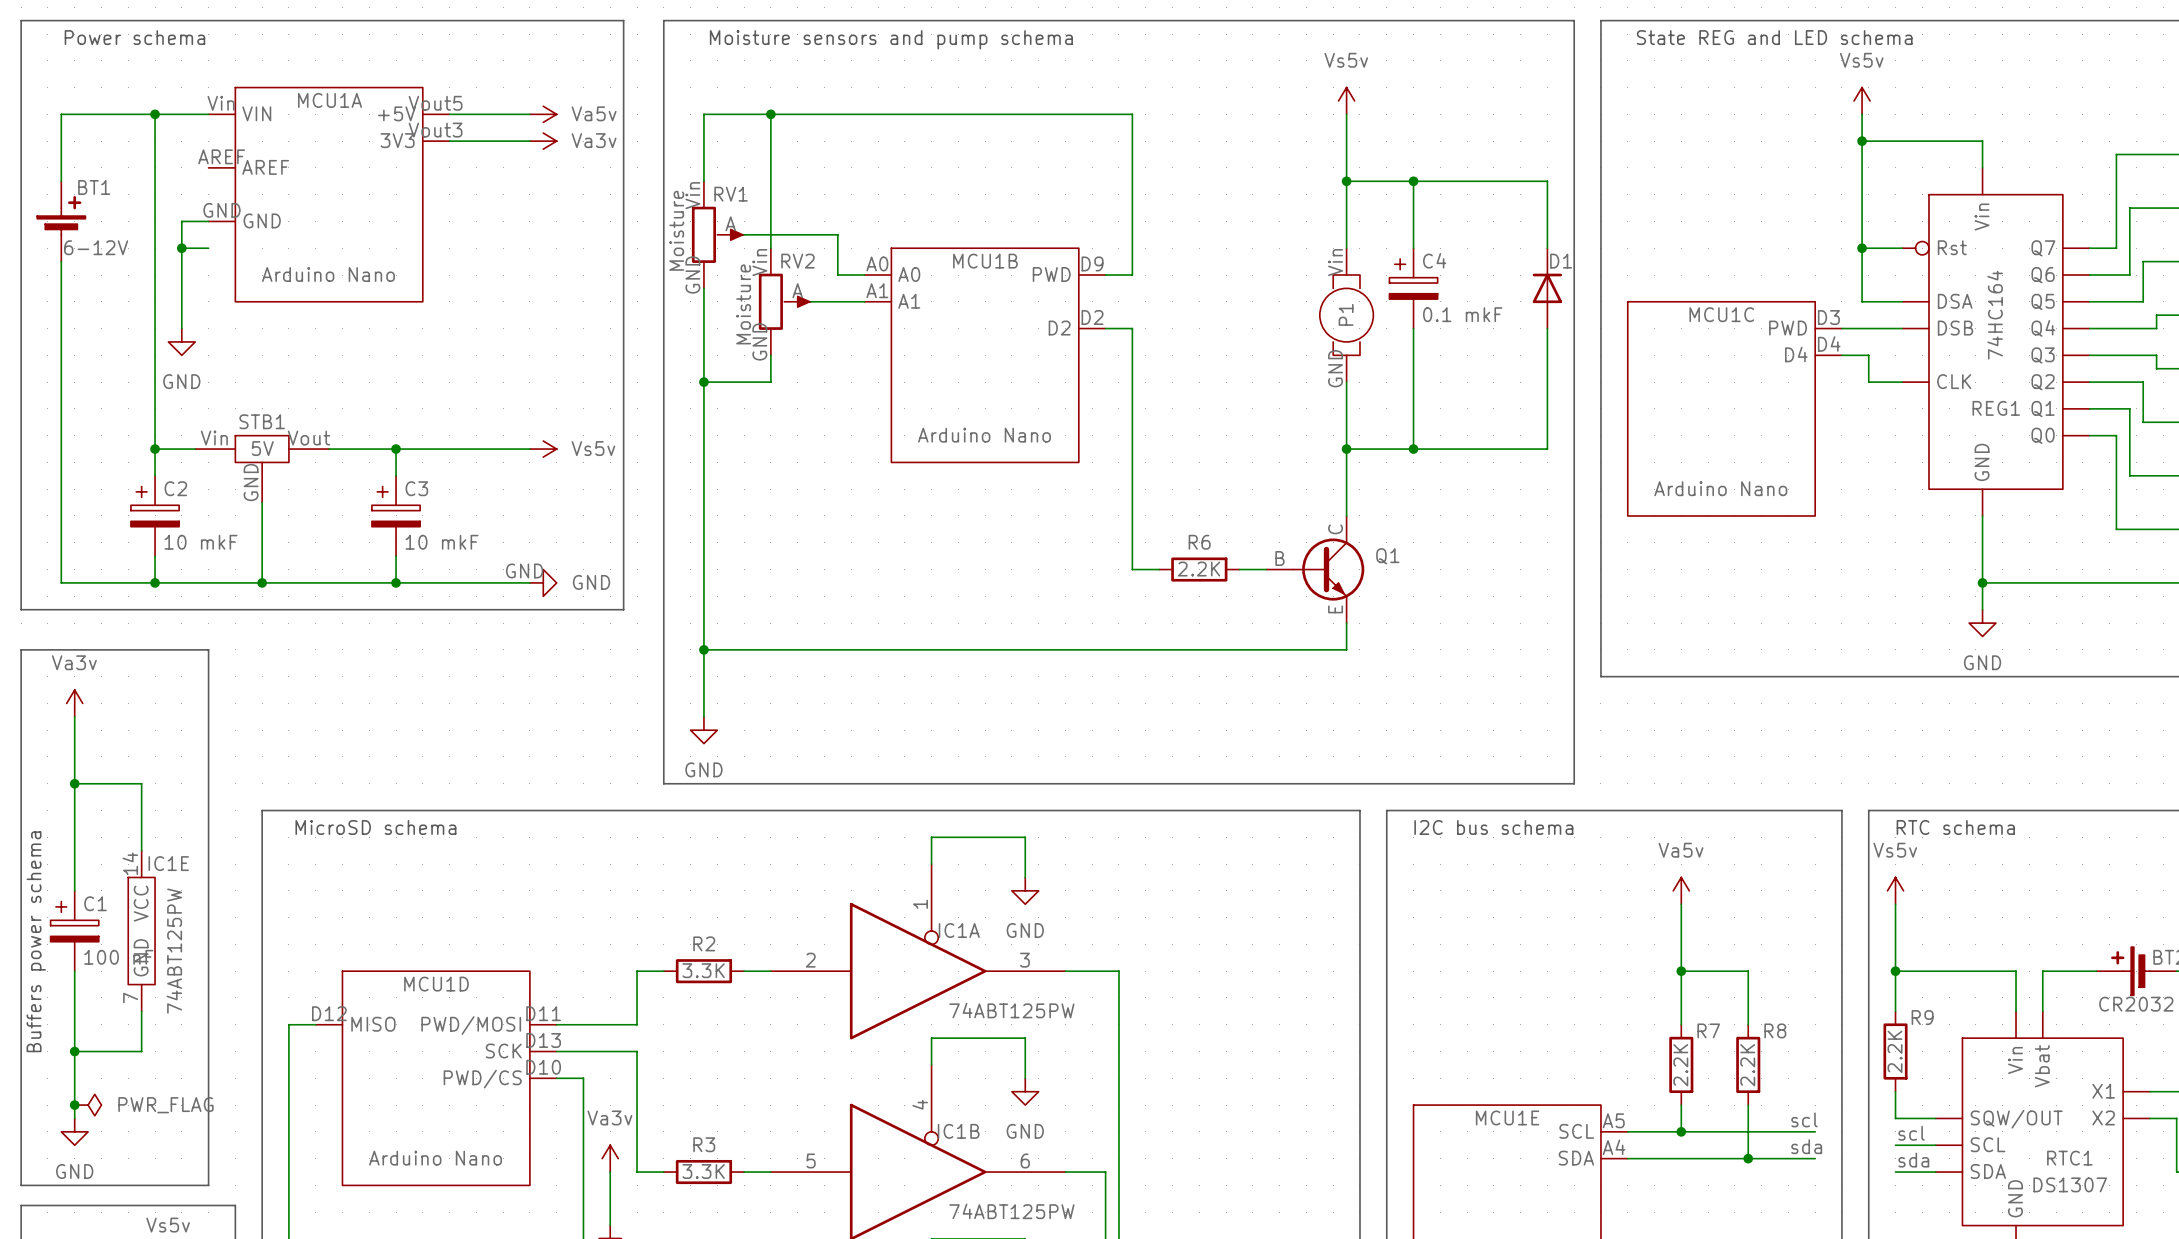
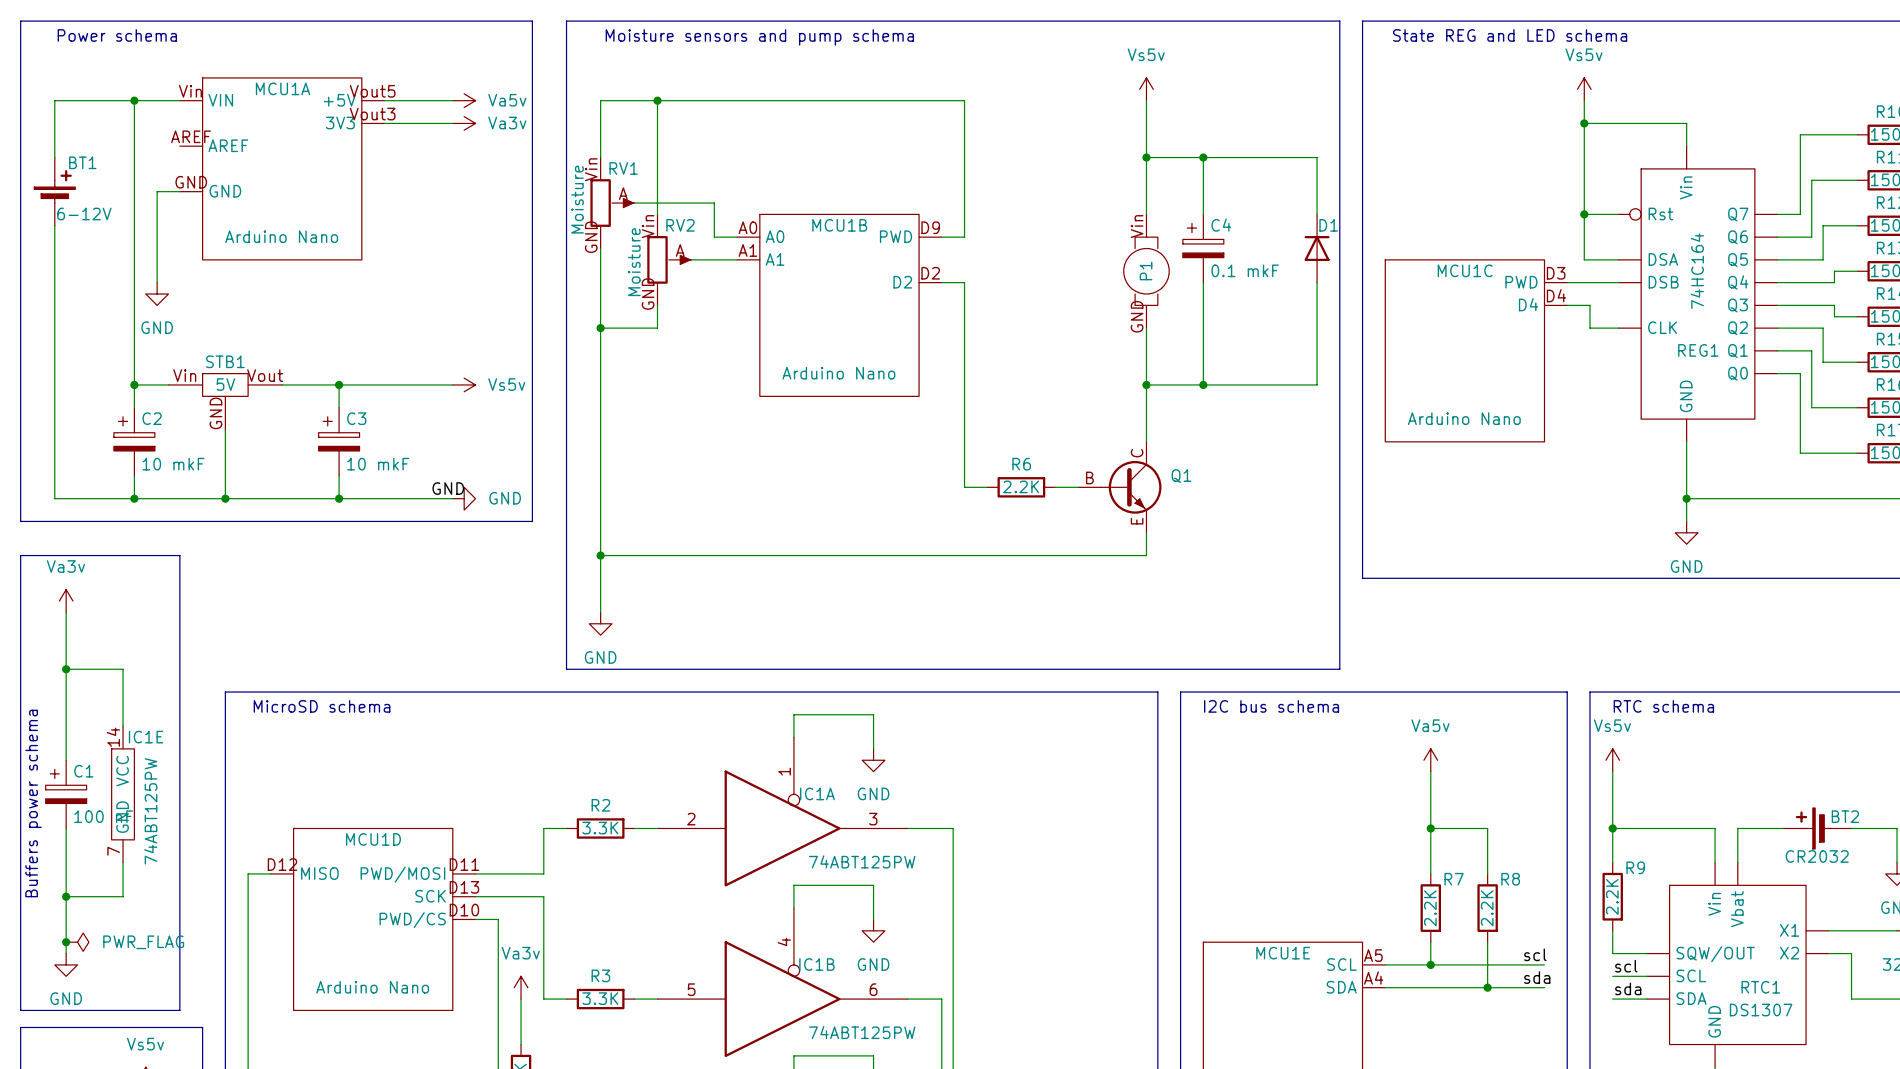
wire: (181, 248) (208, 248) -> none
junction: (181, 248) -> none

